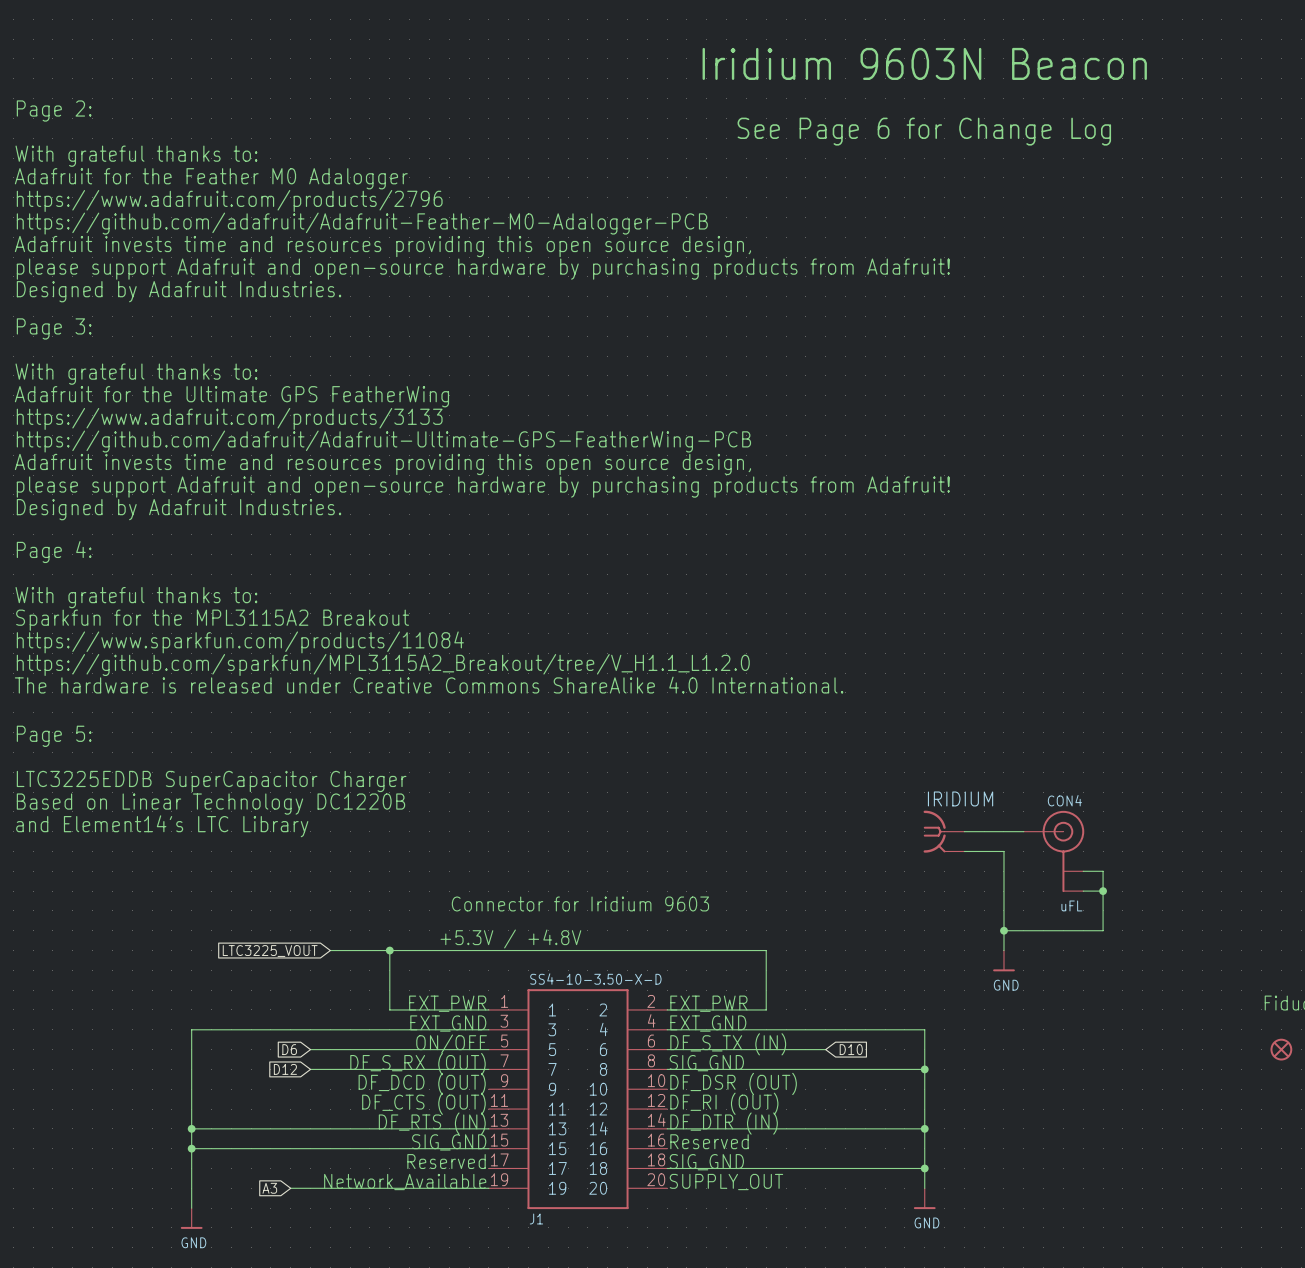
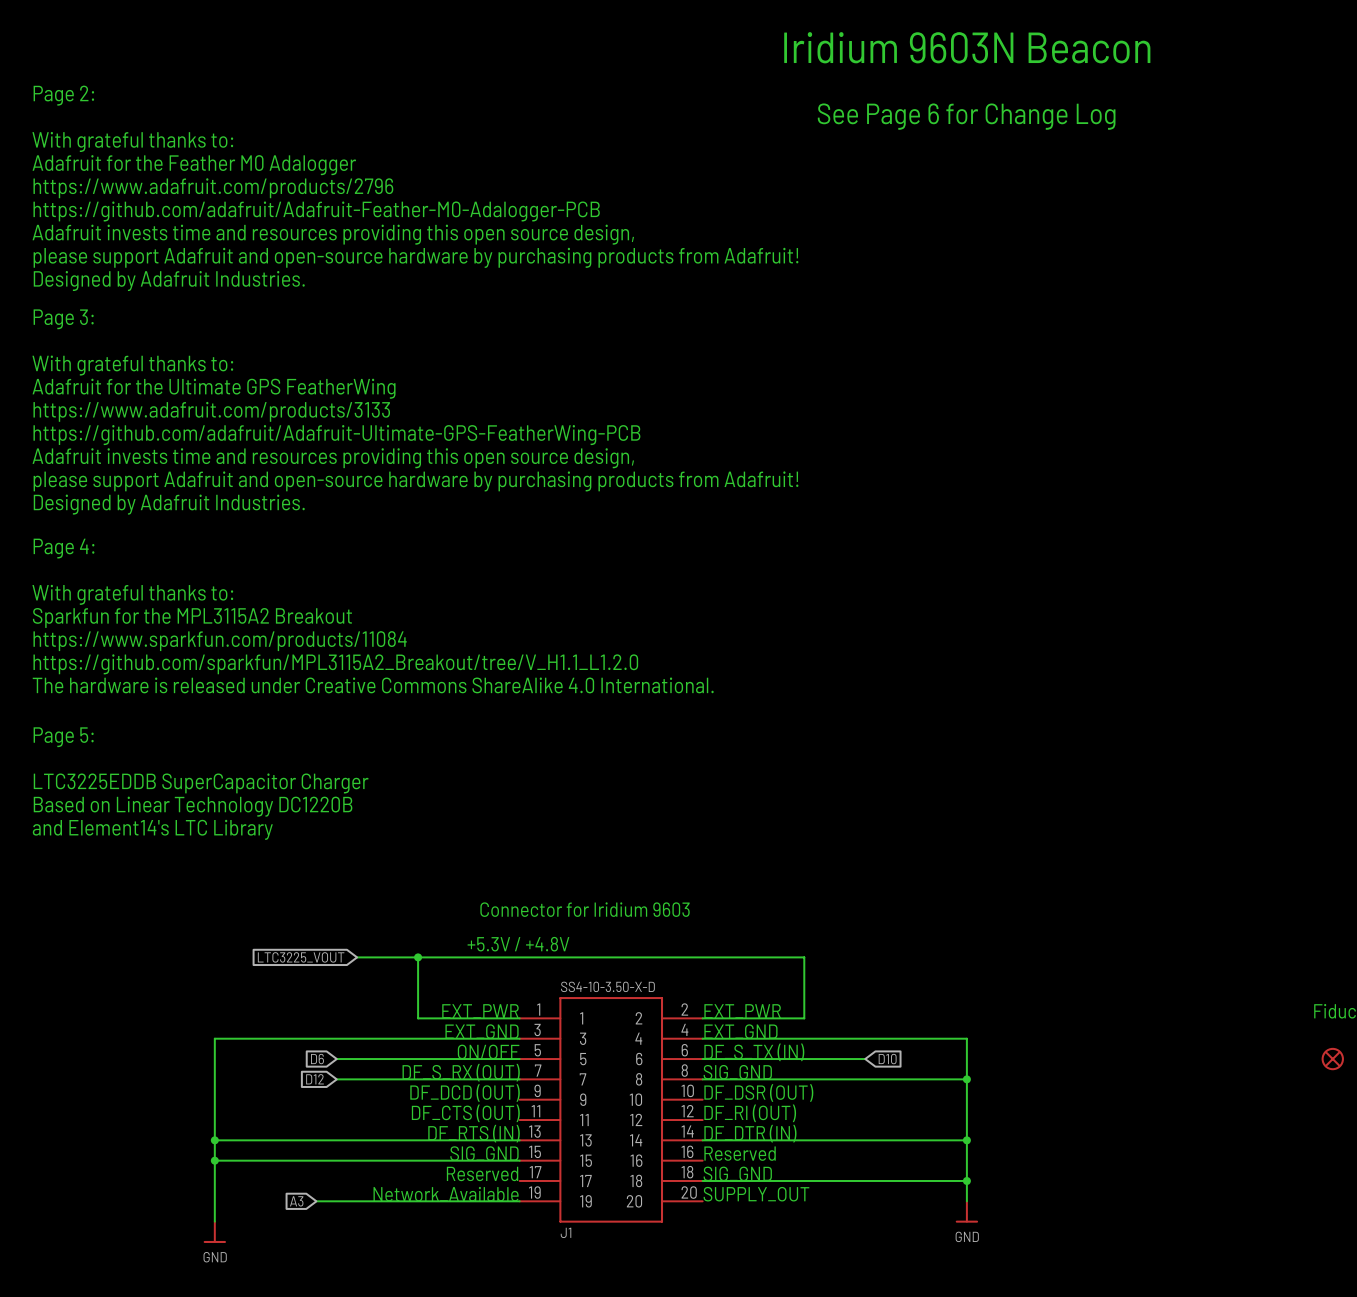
IRIDIUM: (943, 831) -> none
wire: (964, 831) (1023, 831) -> none
wire: (964, 851) (1003, 851) (1003, 950) -> none
CON4: uFL (1054, 851) -> none
wire: (1083, 871) (1103, 871) (1103, 930) (1003, 930) -> none
wire: (1083, 891) (1103, 891) -> none
junction: (1103, 891) -> none
junction: (1003, 930) -> none
power symbol: GND (1003, 960) -> none

